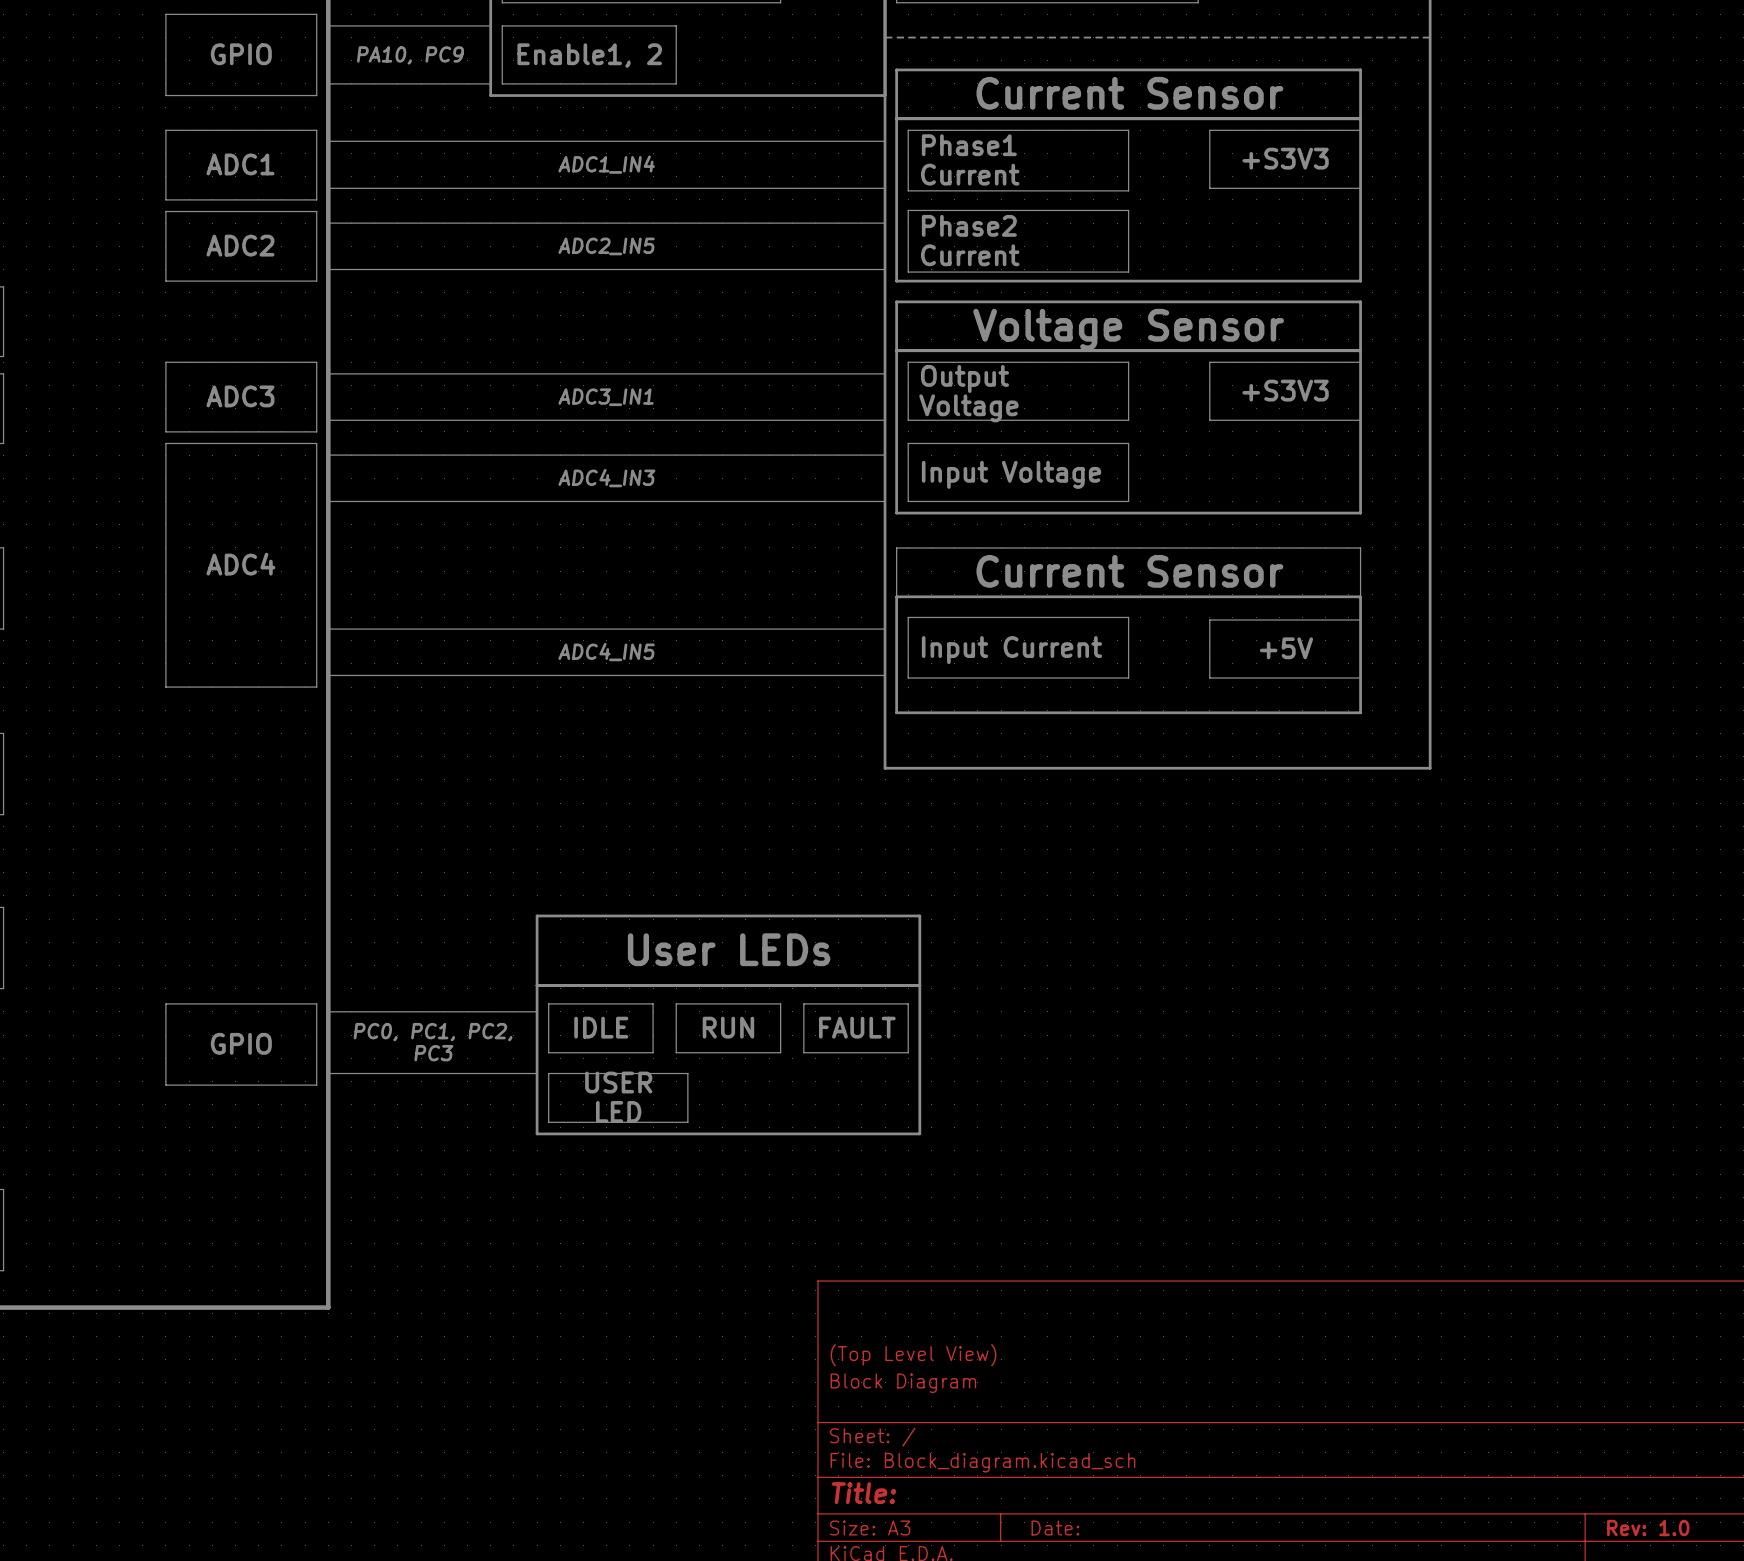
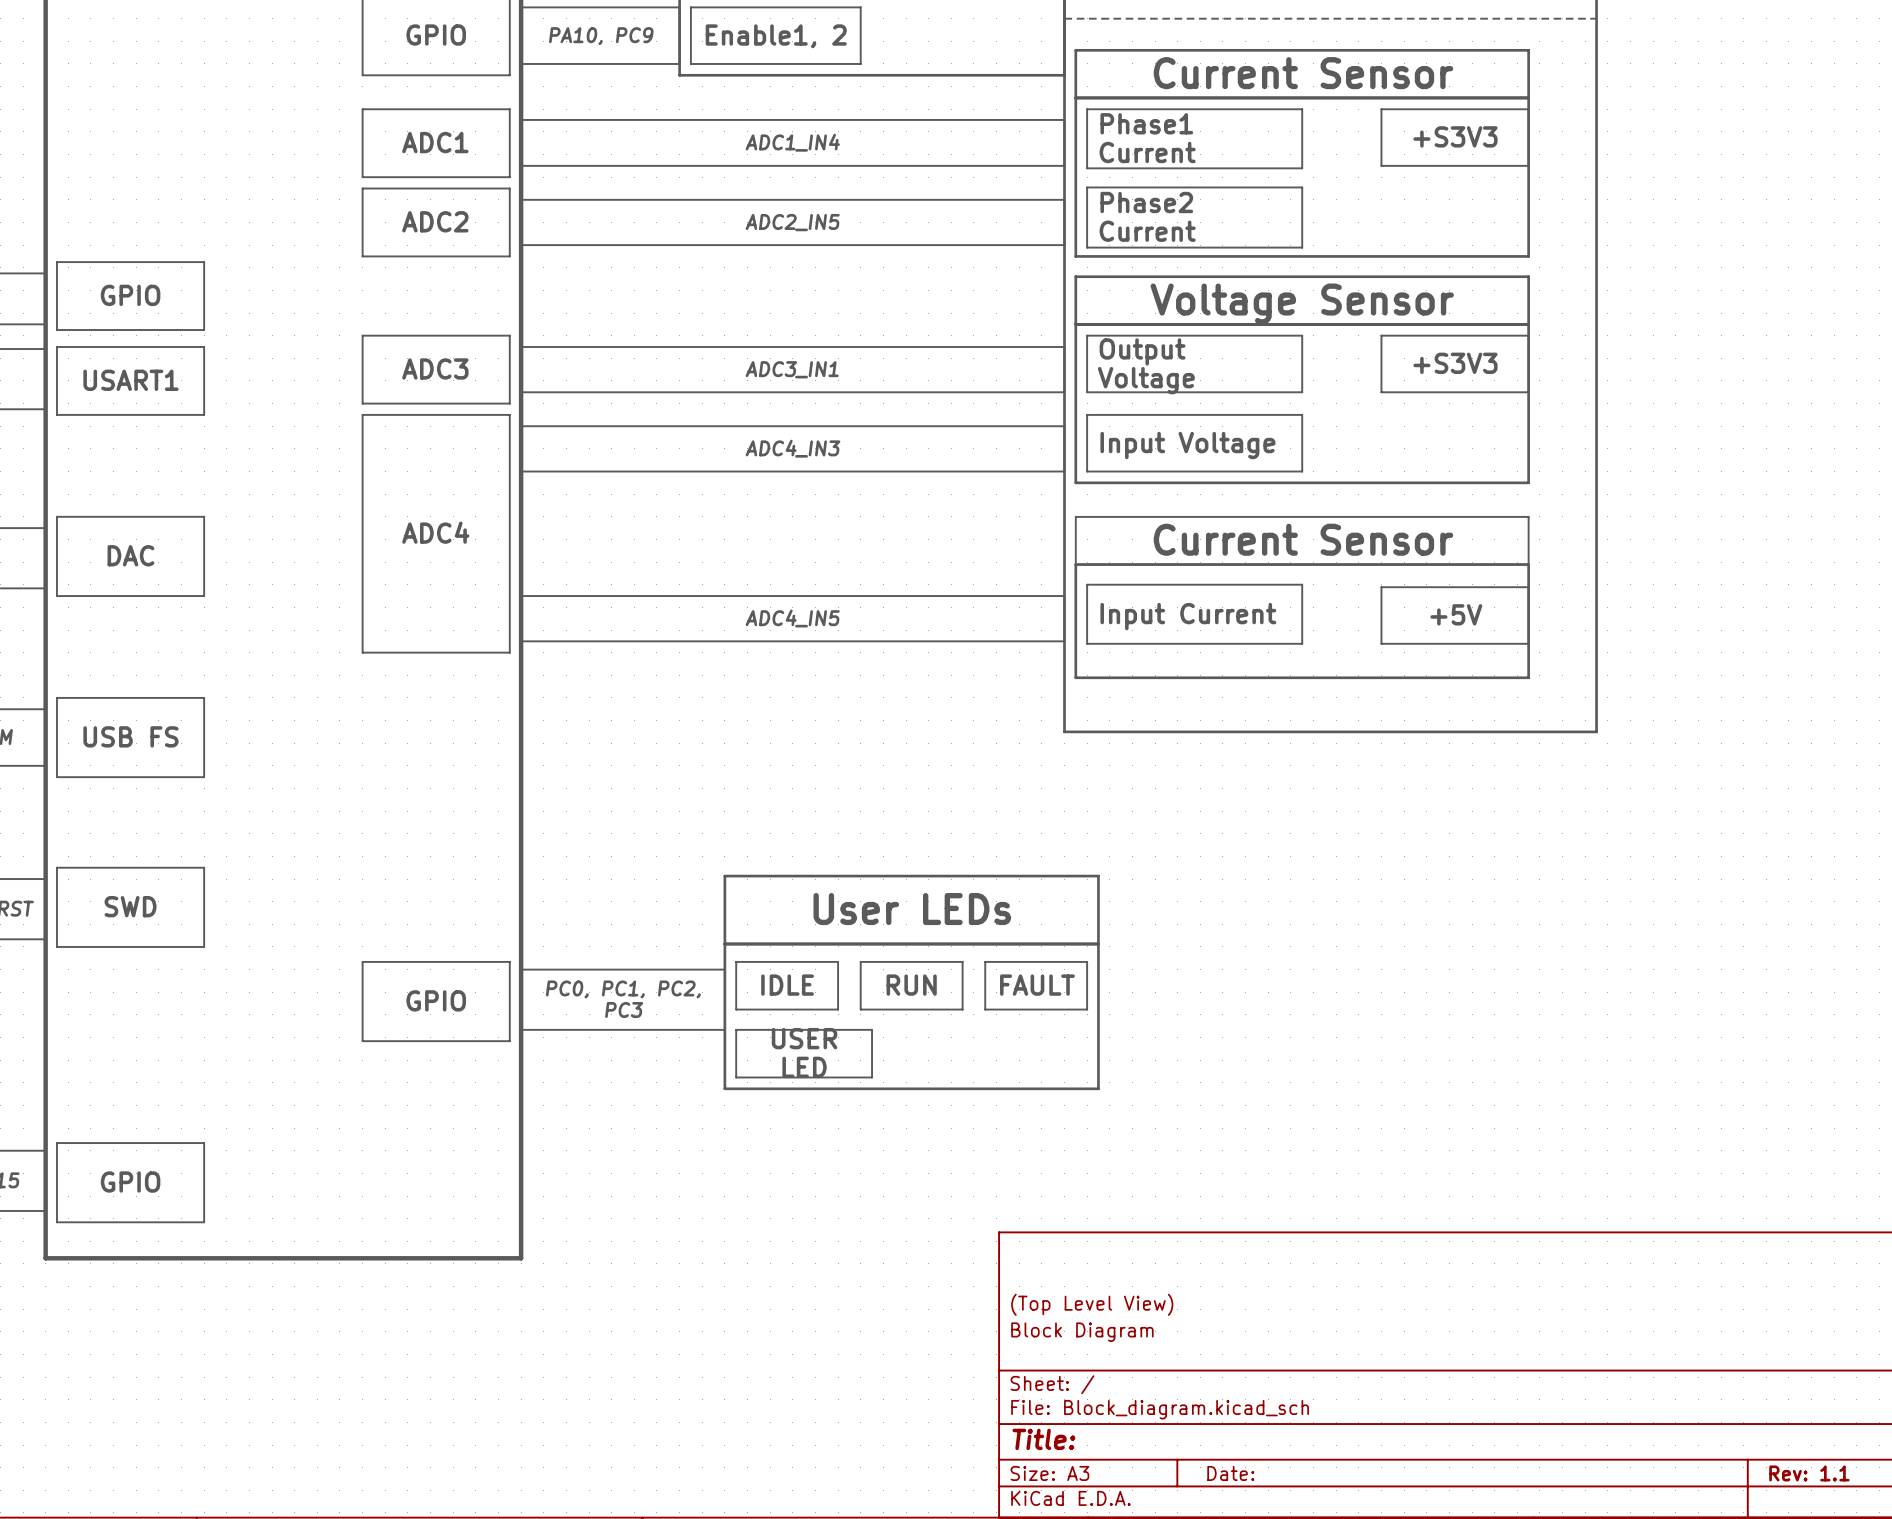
title block: Rev: 1.0 (1648, 1528) -> Rev: 1.1 (1809, 1473)

